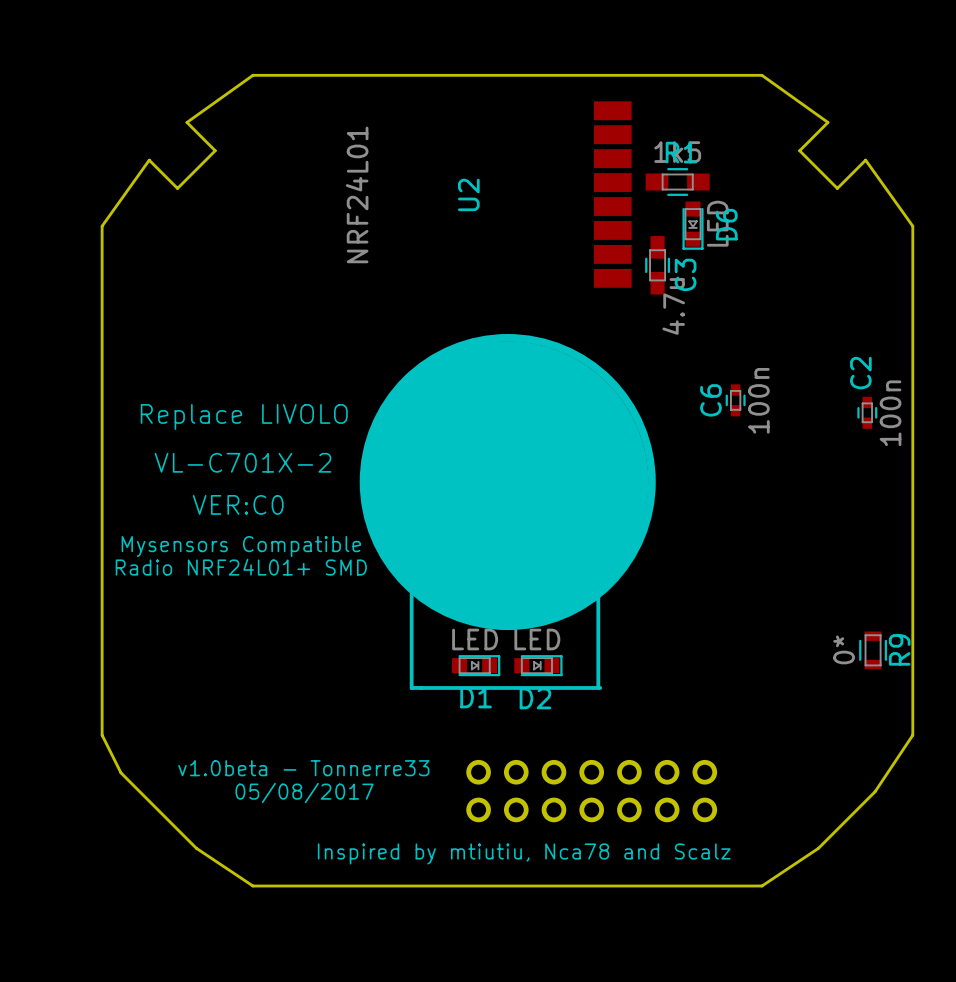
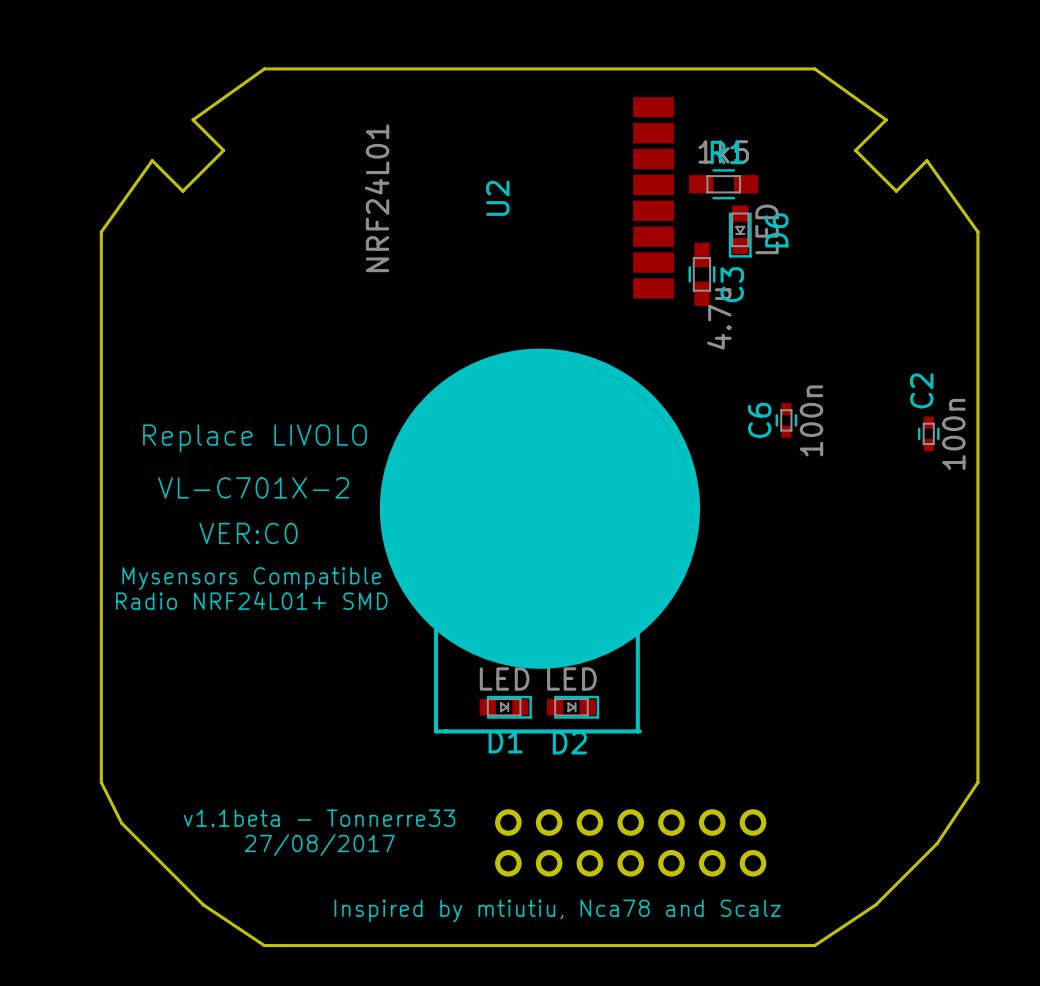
R9: 0* (873, 650) -> none
text: v1.0beta - Tonnerre33 (303, 768) -> v1.1beta - Tonnerre33 (319, 818)
text: 05/08/2017 (304, 793) -> 27/08/2017 (319, 845)

